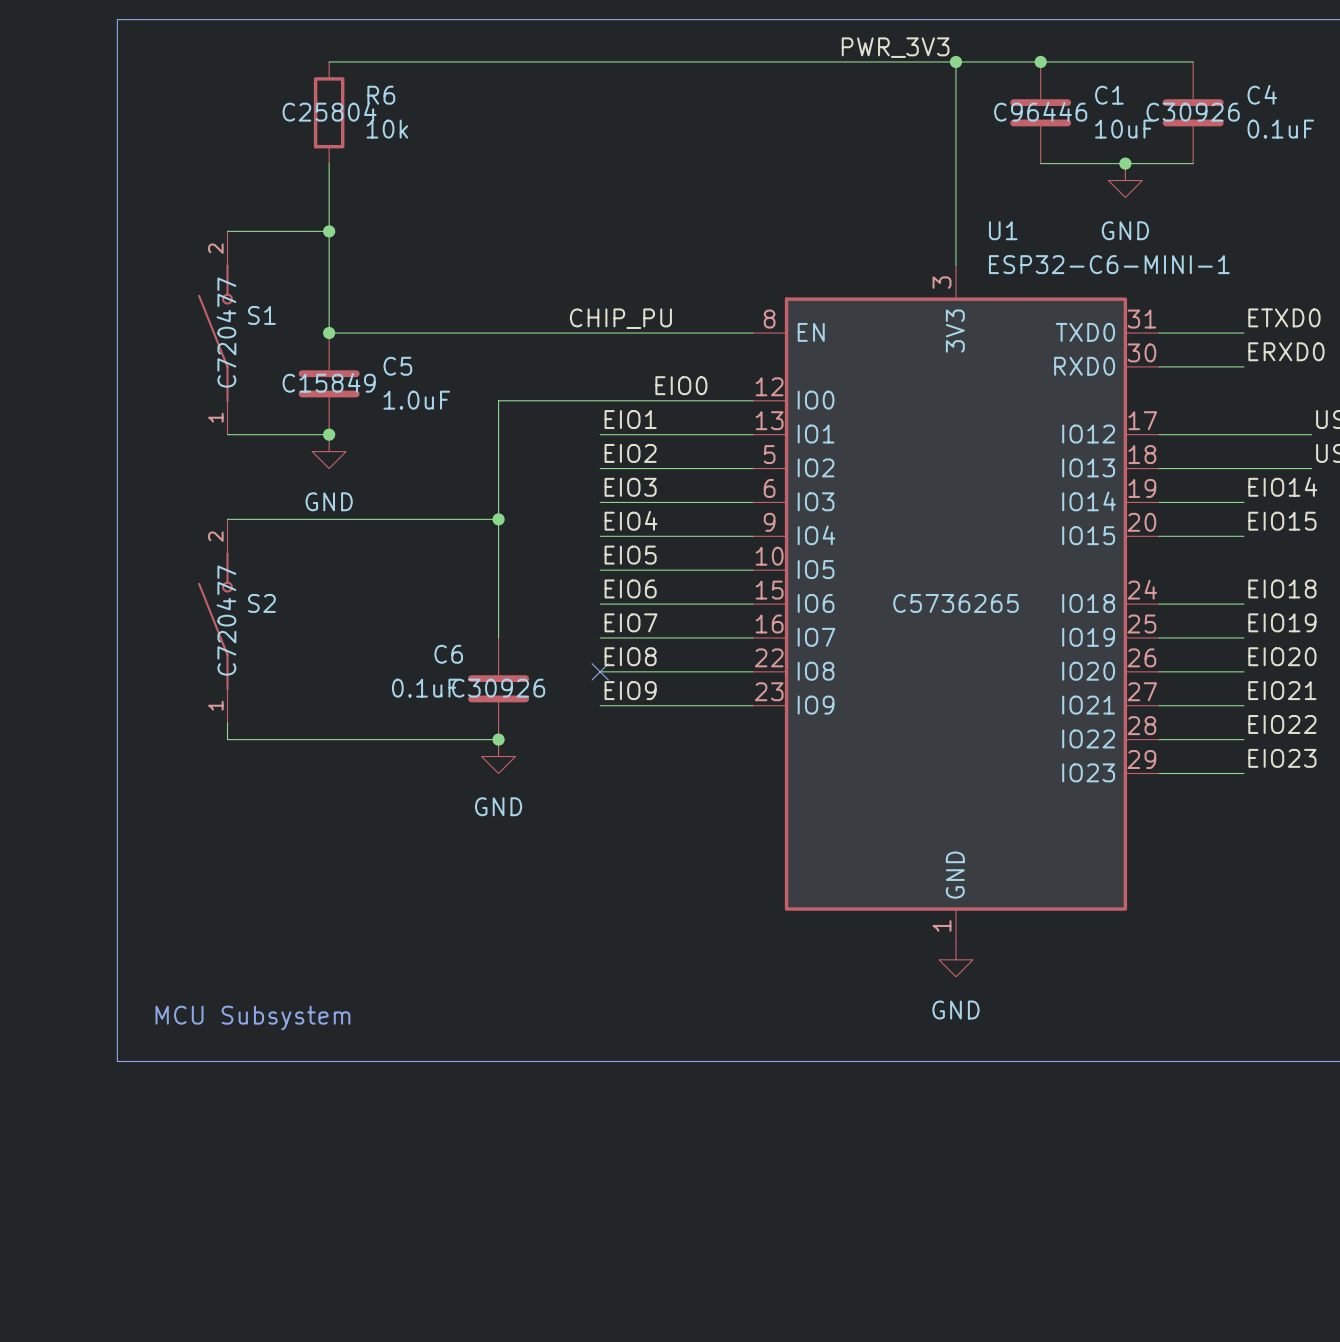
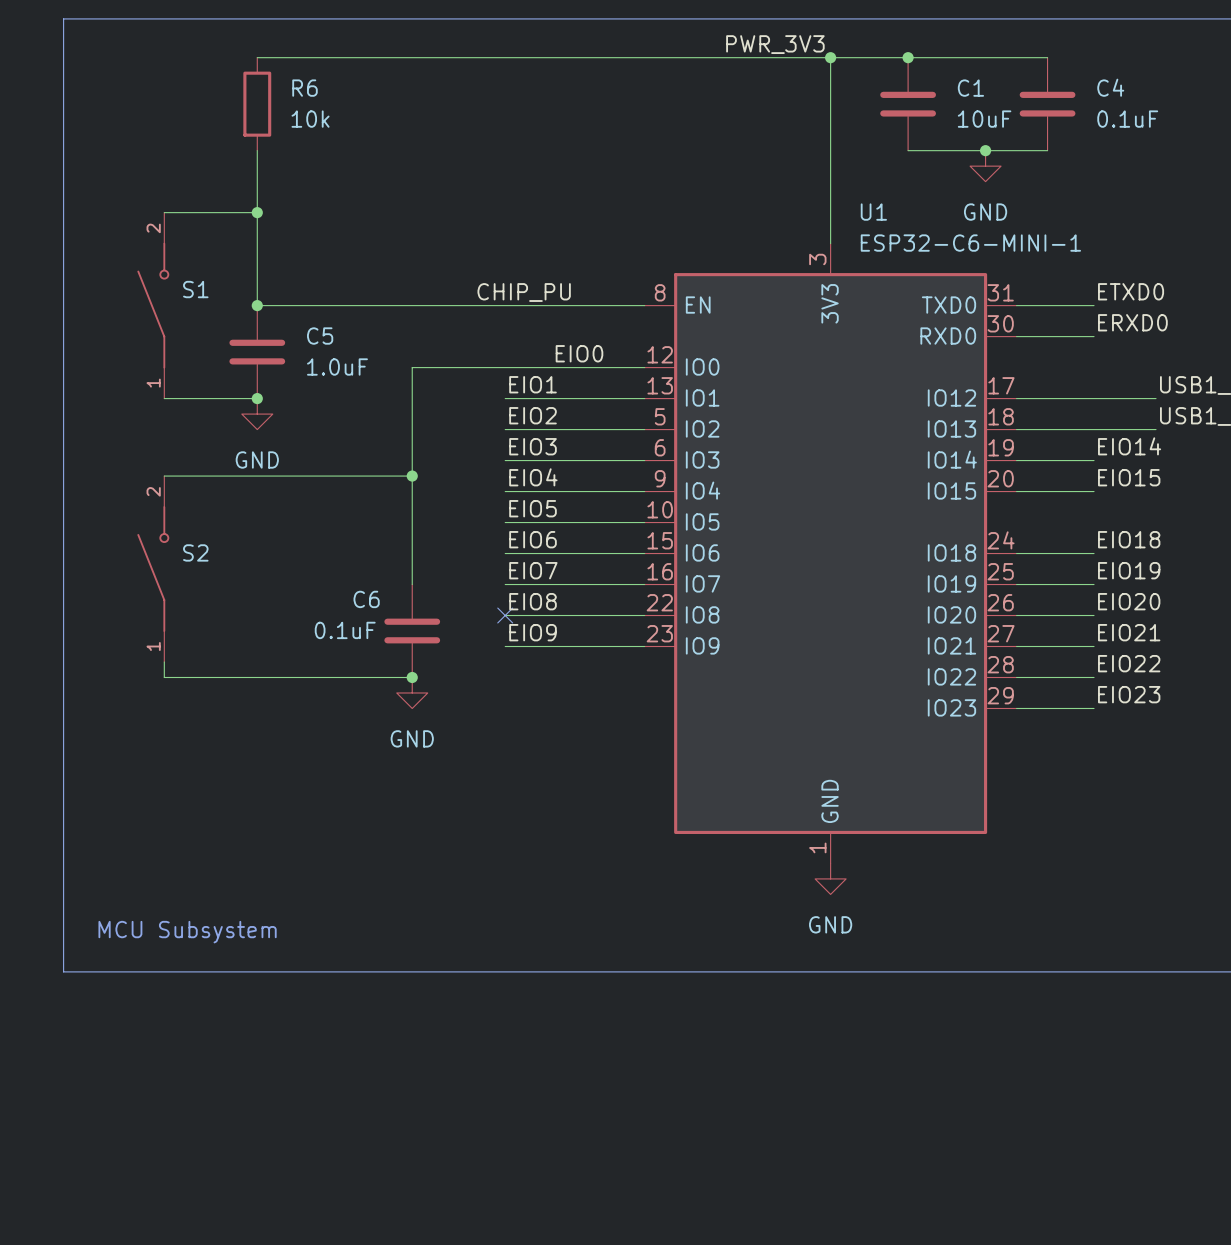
R6 text: C25804 (329, 111) -> none
C1 text: C96446 (1040, 111) -> none
C4 text: C30926 (1193, 112) -> none
S1 text: C720477 (226, 332) -> none
C5 text: C15849 (329, 382) -> none
U1 text: C5736265 (955, 603) -> none
S2 text: C720477 (226, 620) -> none
C6 text: C30926 (498, 688) -> none

